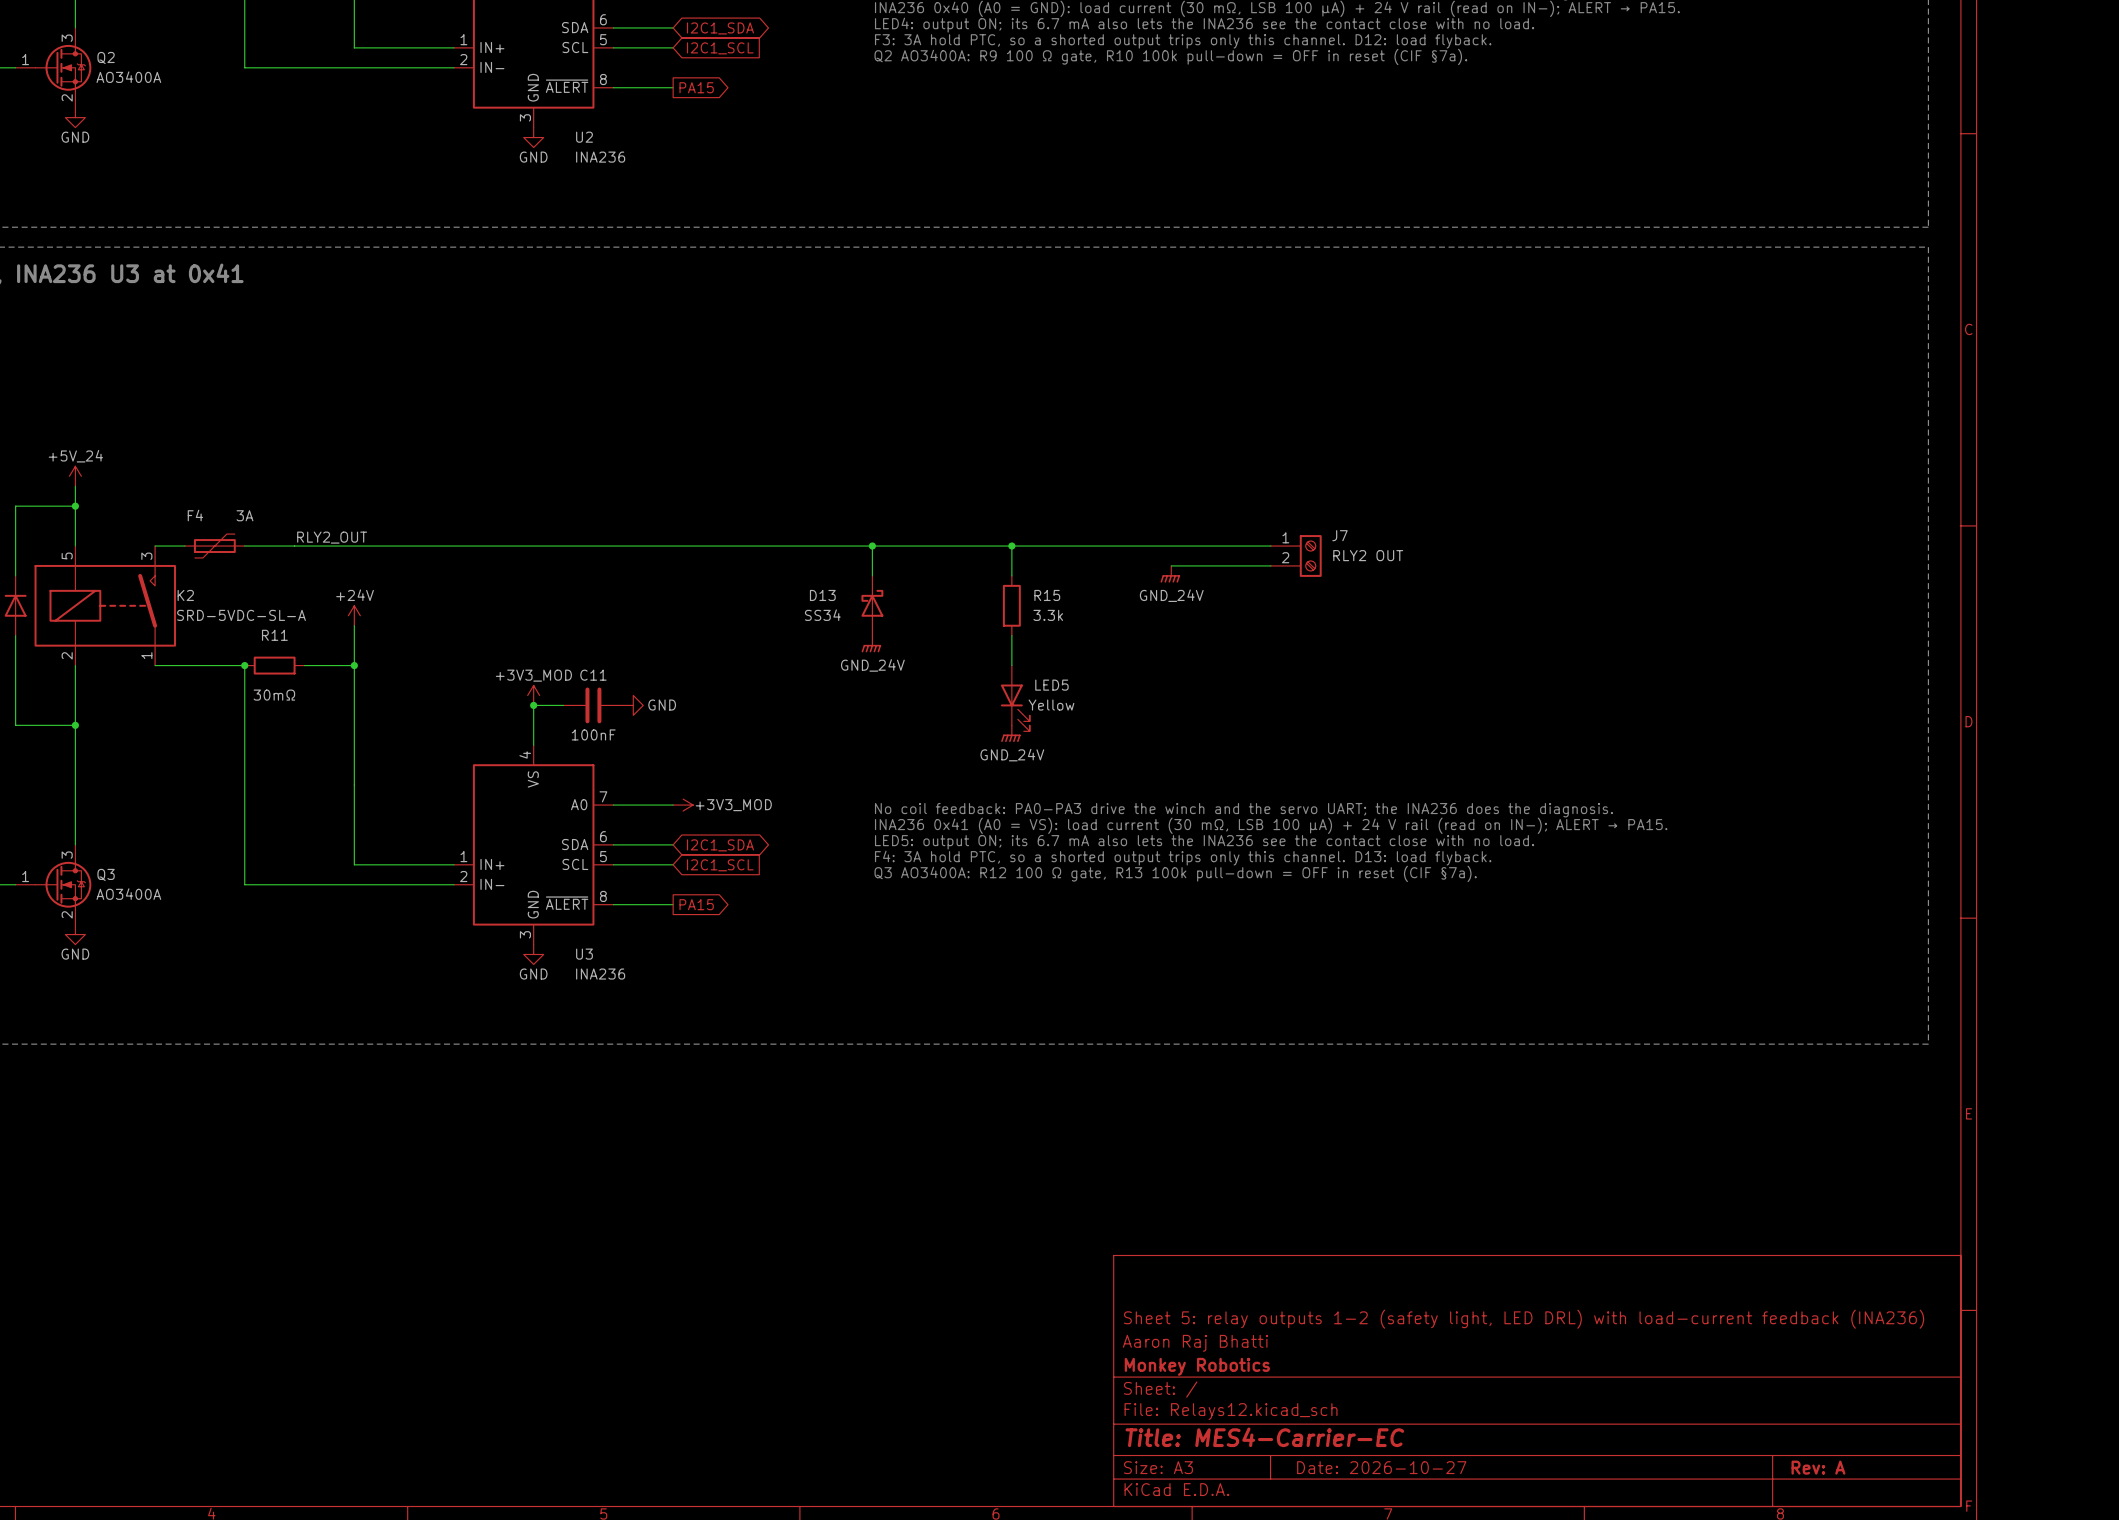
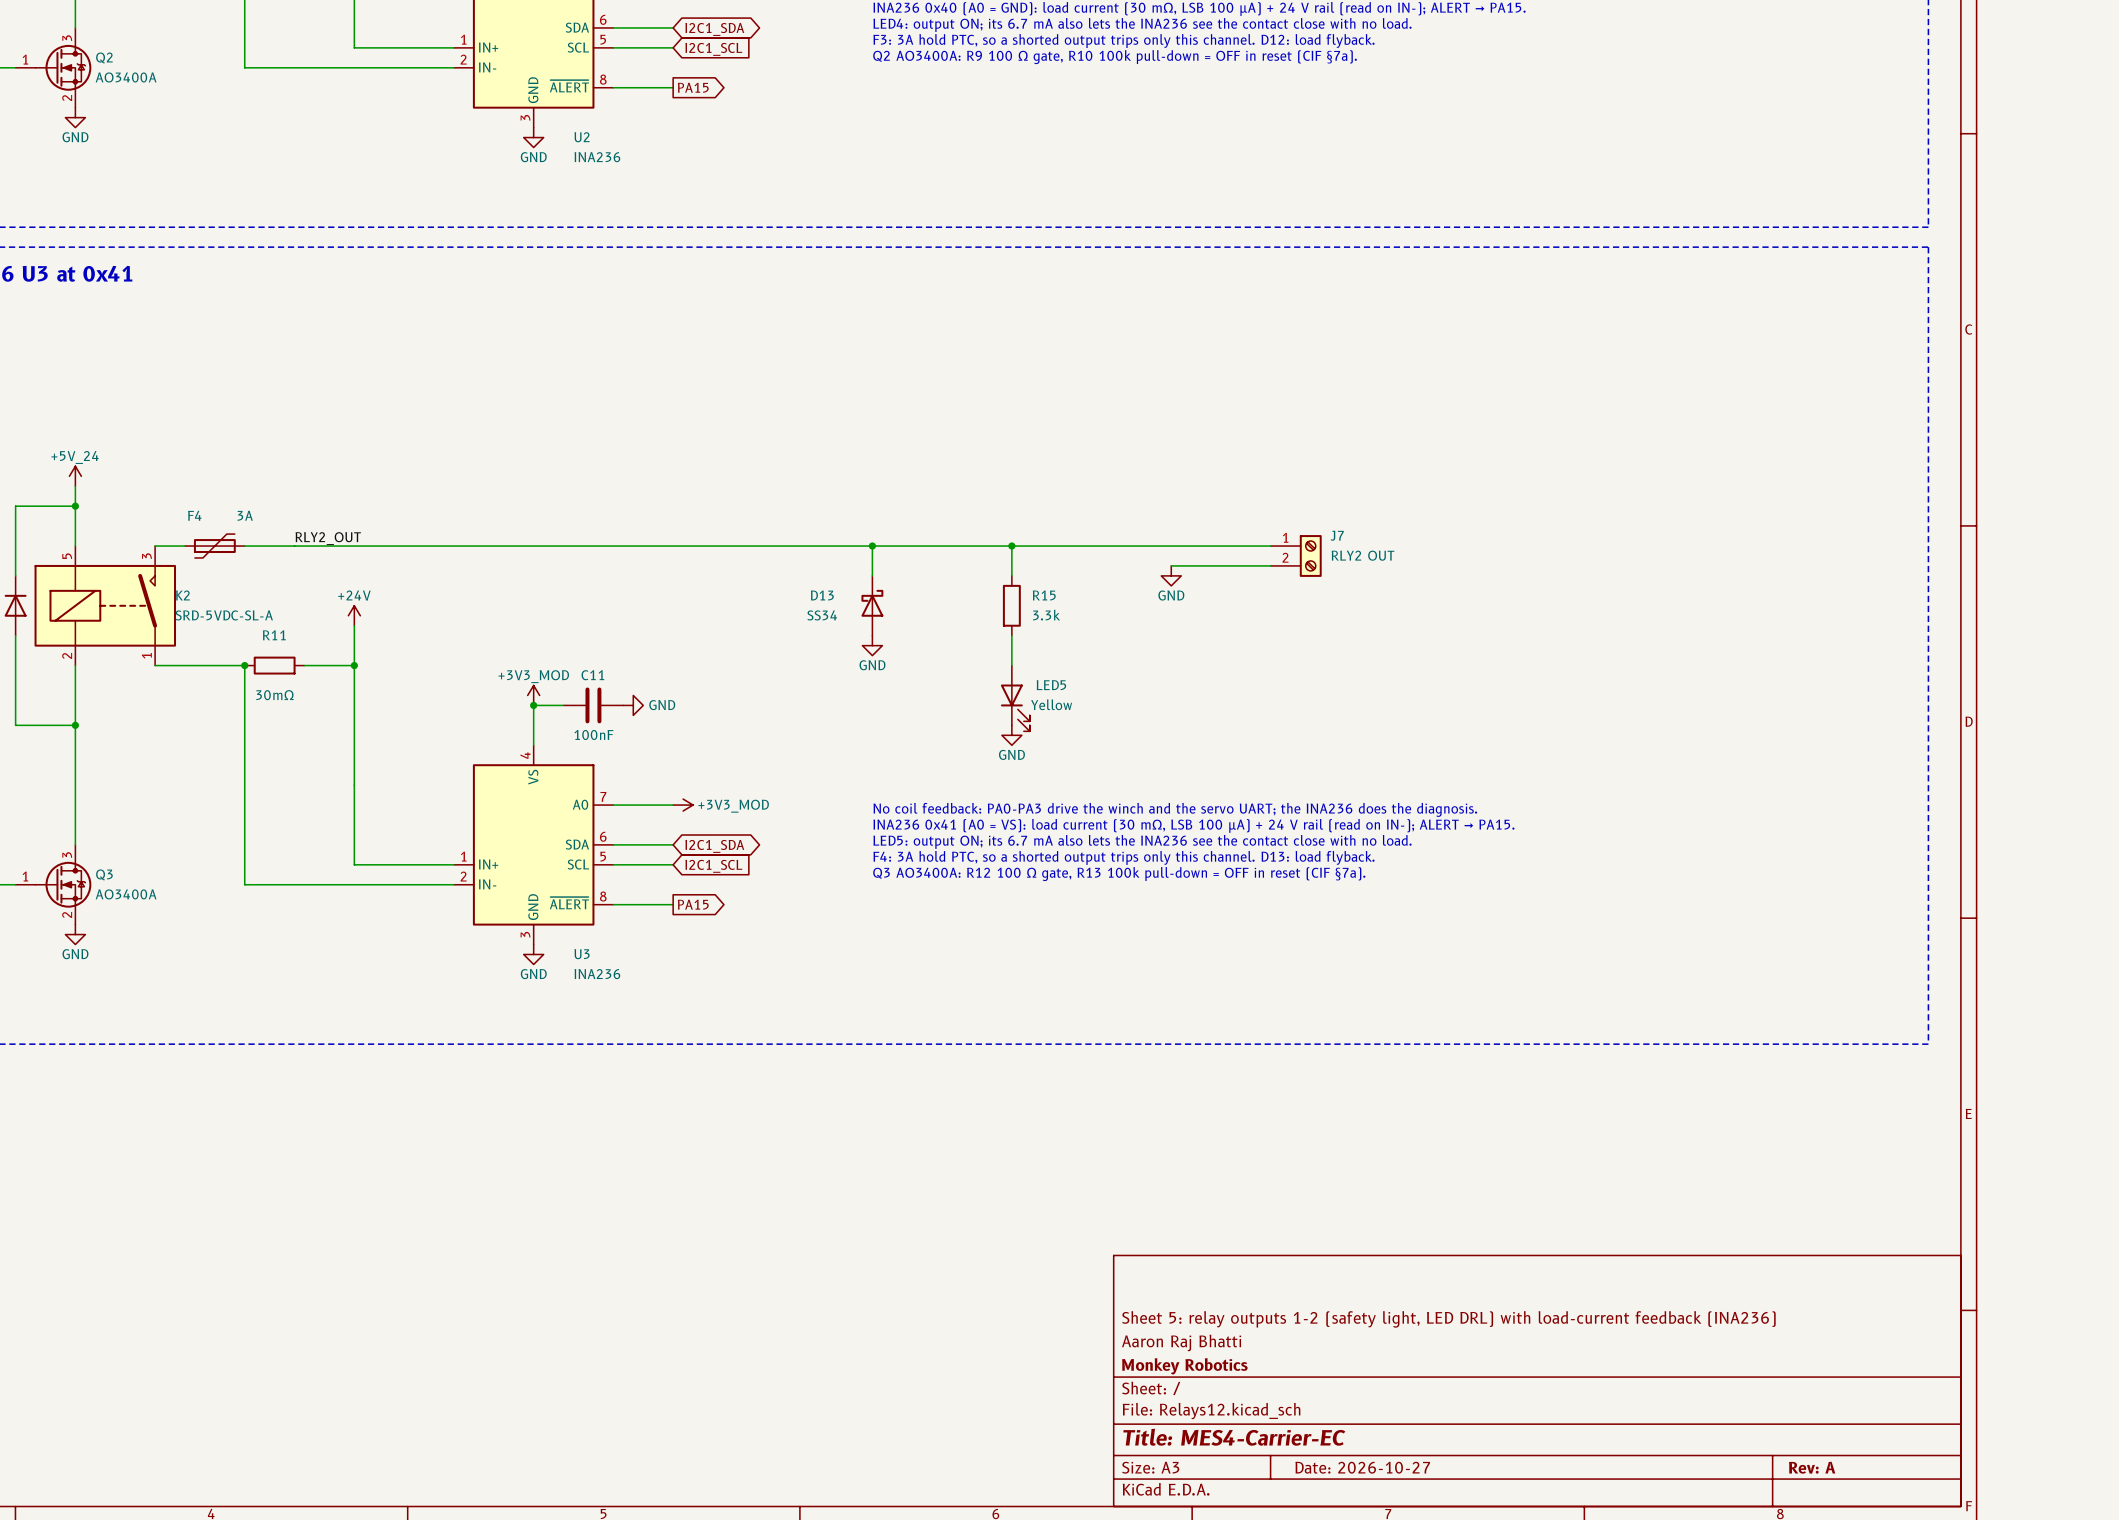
power symbol: GND_24V (1170, 574) -> GND (1171, 575)
power symbol: GND_24V (871, 644) -> GND (872, 645)
power symbol: GND_24V (1010, 733) -> GND (1011, 735)

